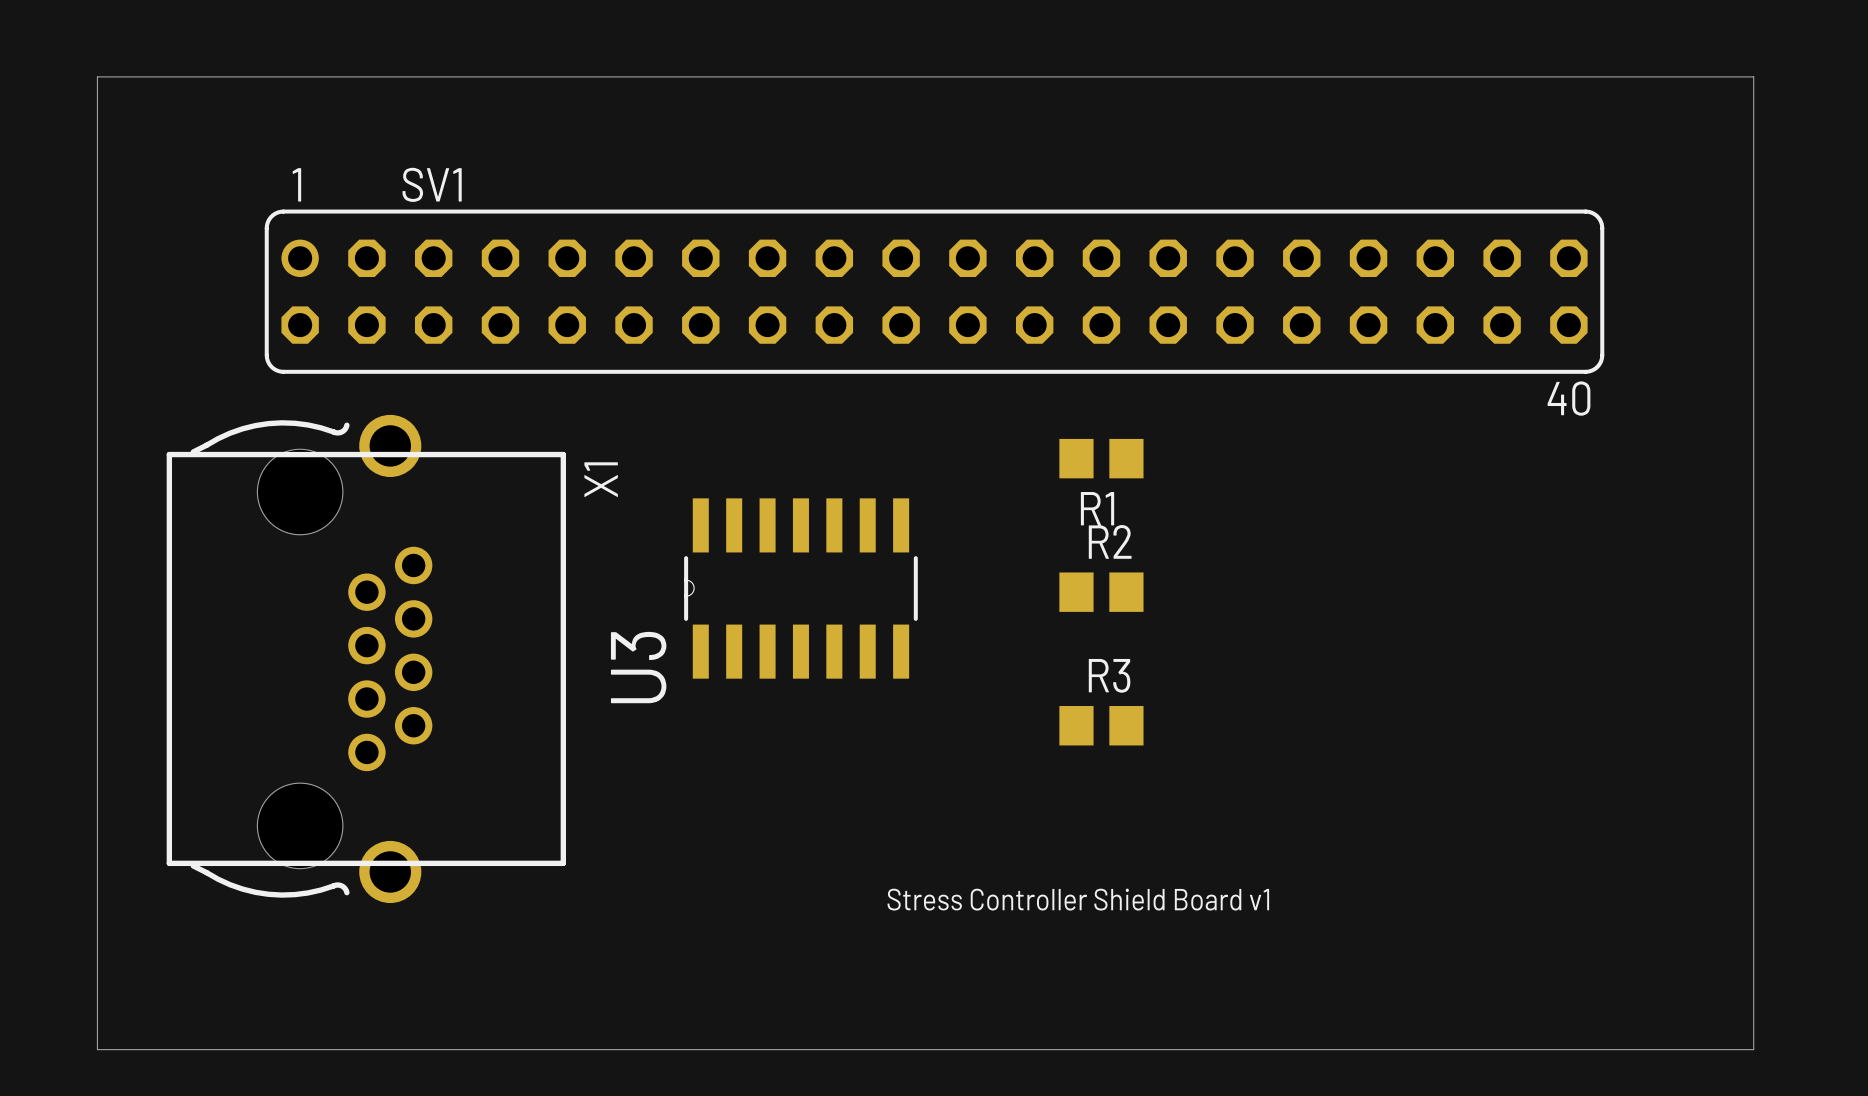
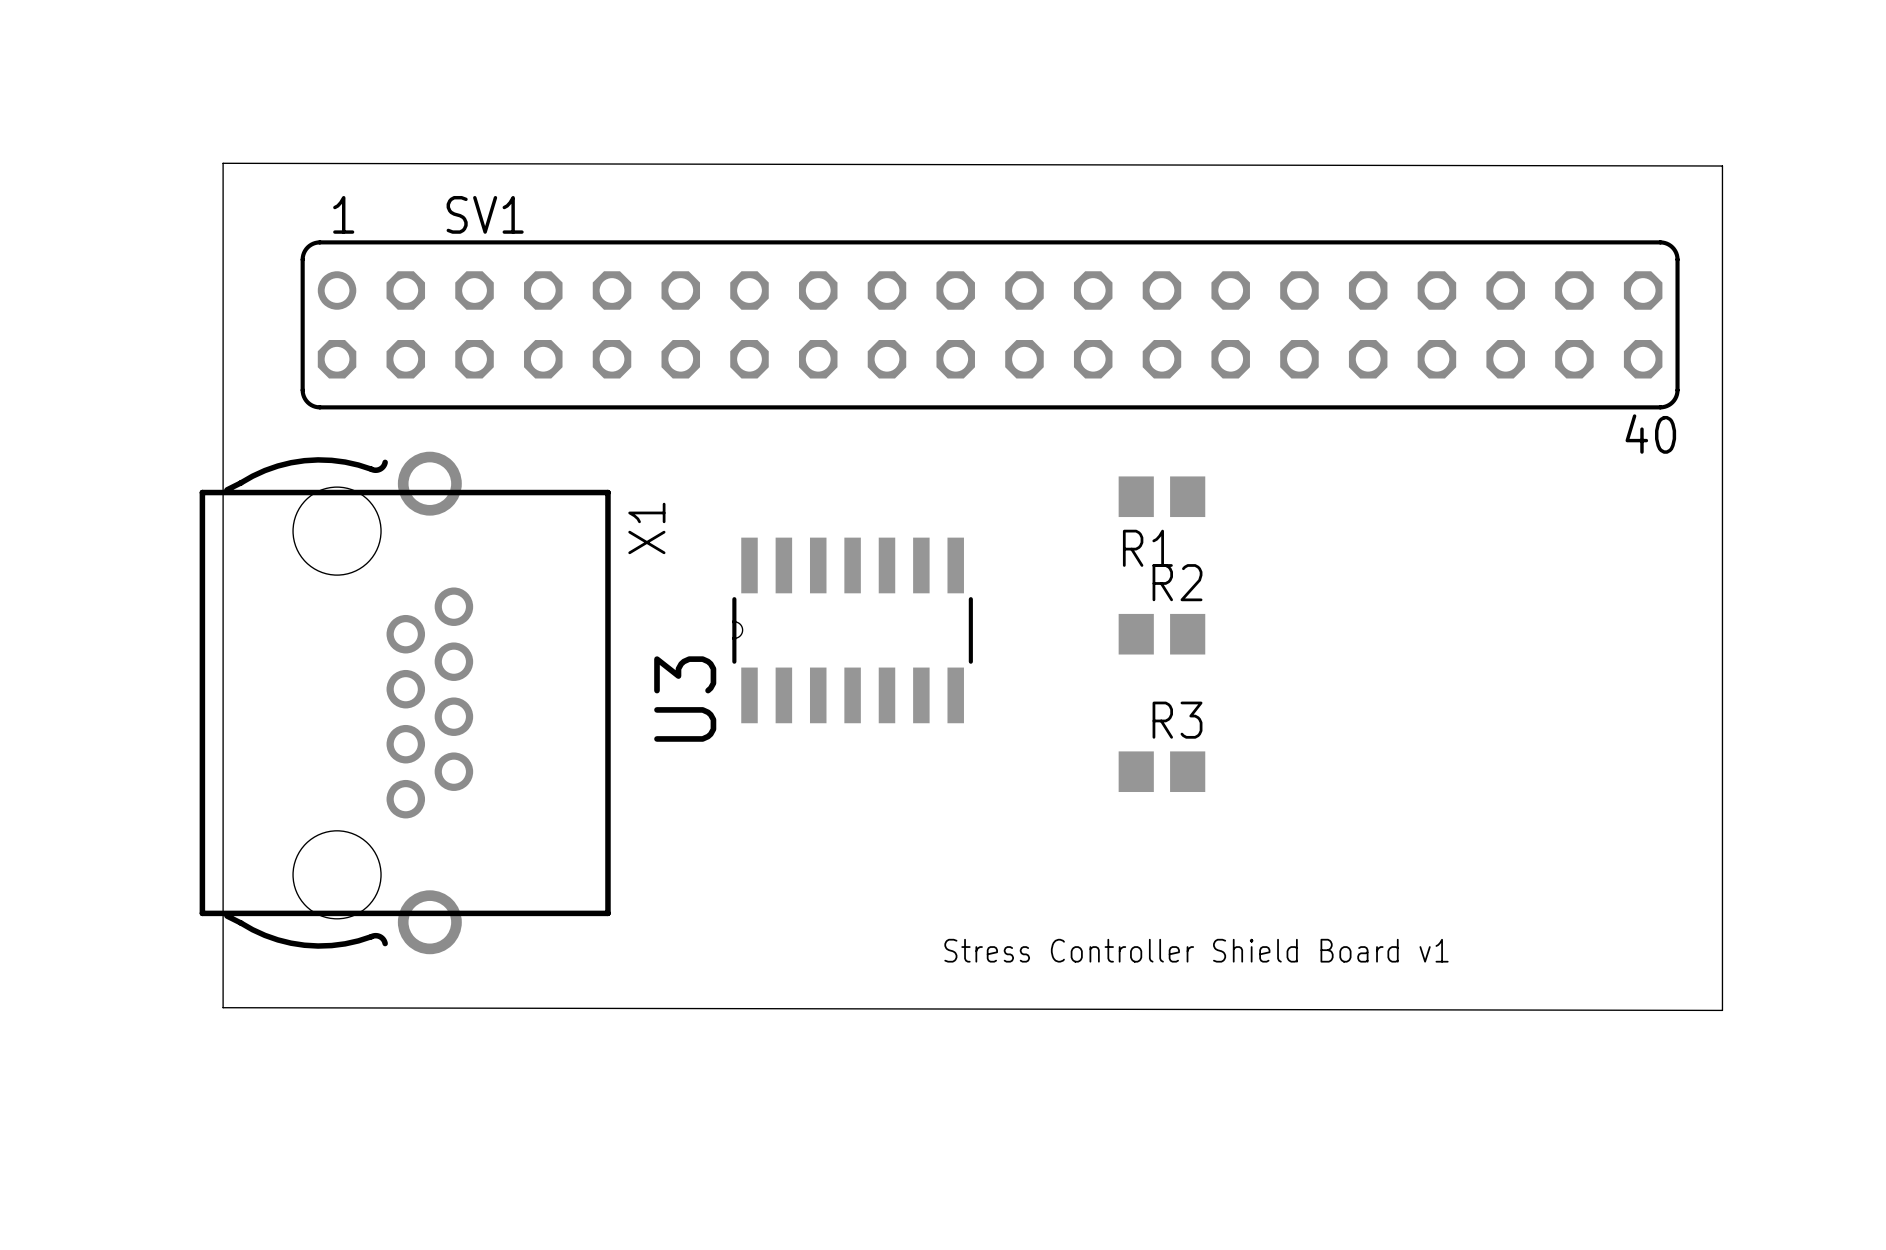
board edge: (97, 76) (1753, 76) (1753, 1049) (97, 1049) (97, 76) -> (223, 163) (223, 1007) (1722, 1010) (1722, 166) (223, 163)

